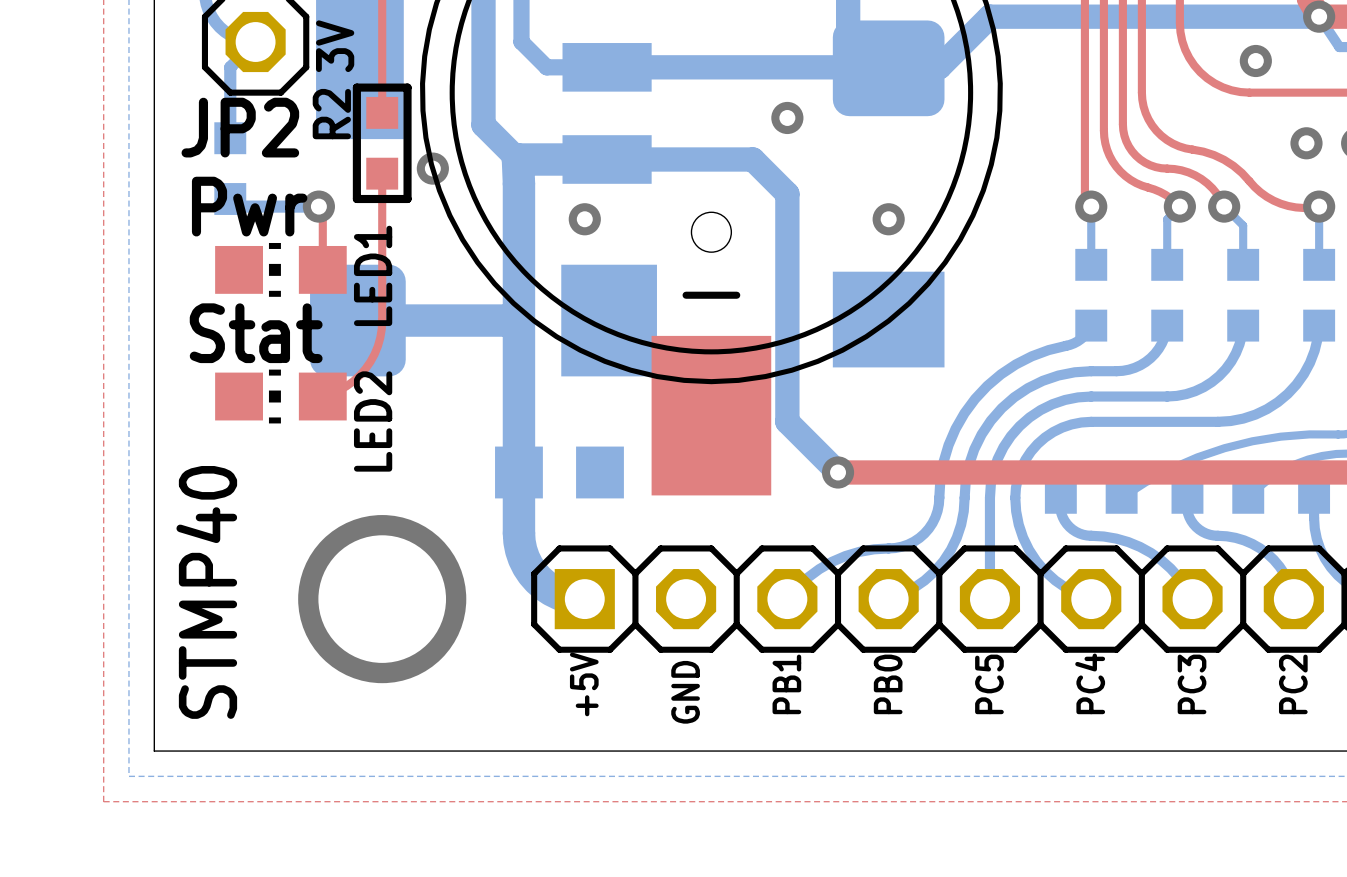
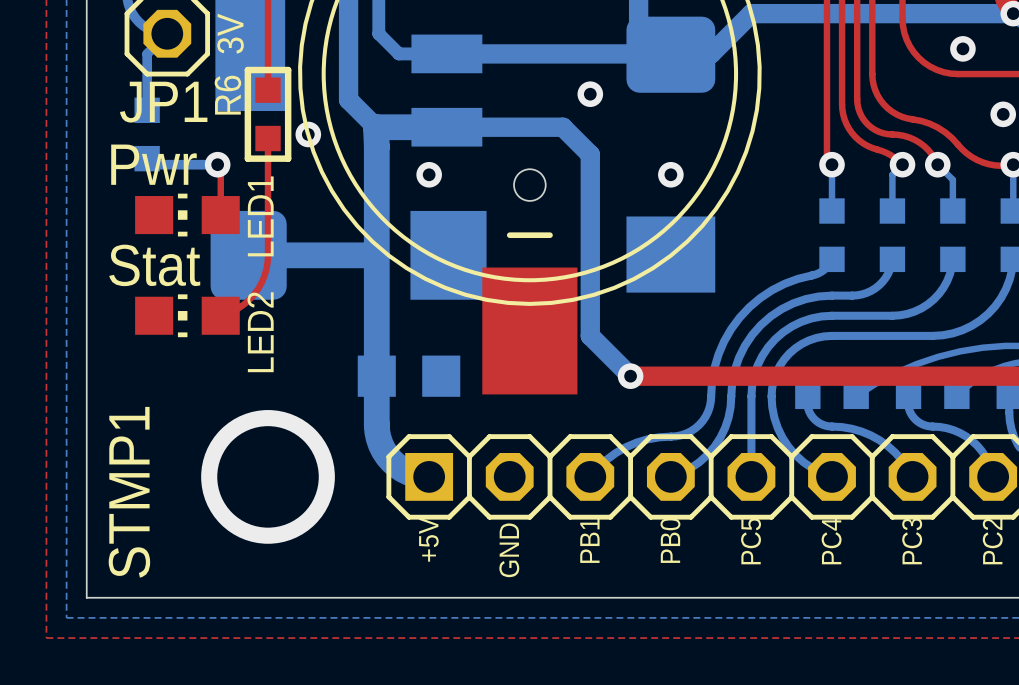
R2 name: R2 (331, 114) -> R6 (227, 95)
JP2 name: JP2 (240, 127) -> JP1 (163, 102)
STMP40 name: STMP40 (206, 592) -> STMP1 (129, 492)

